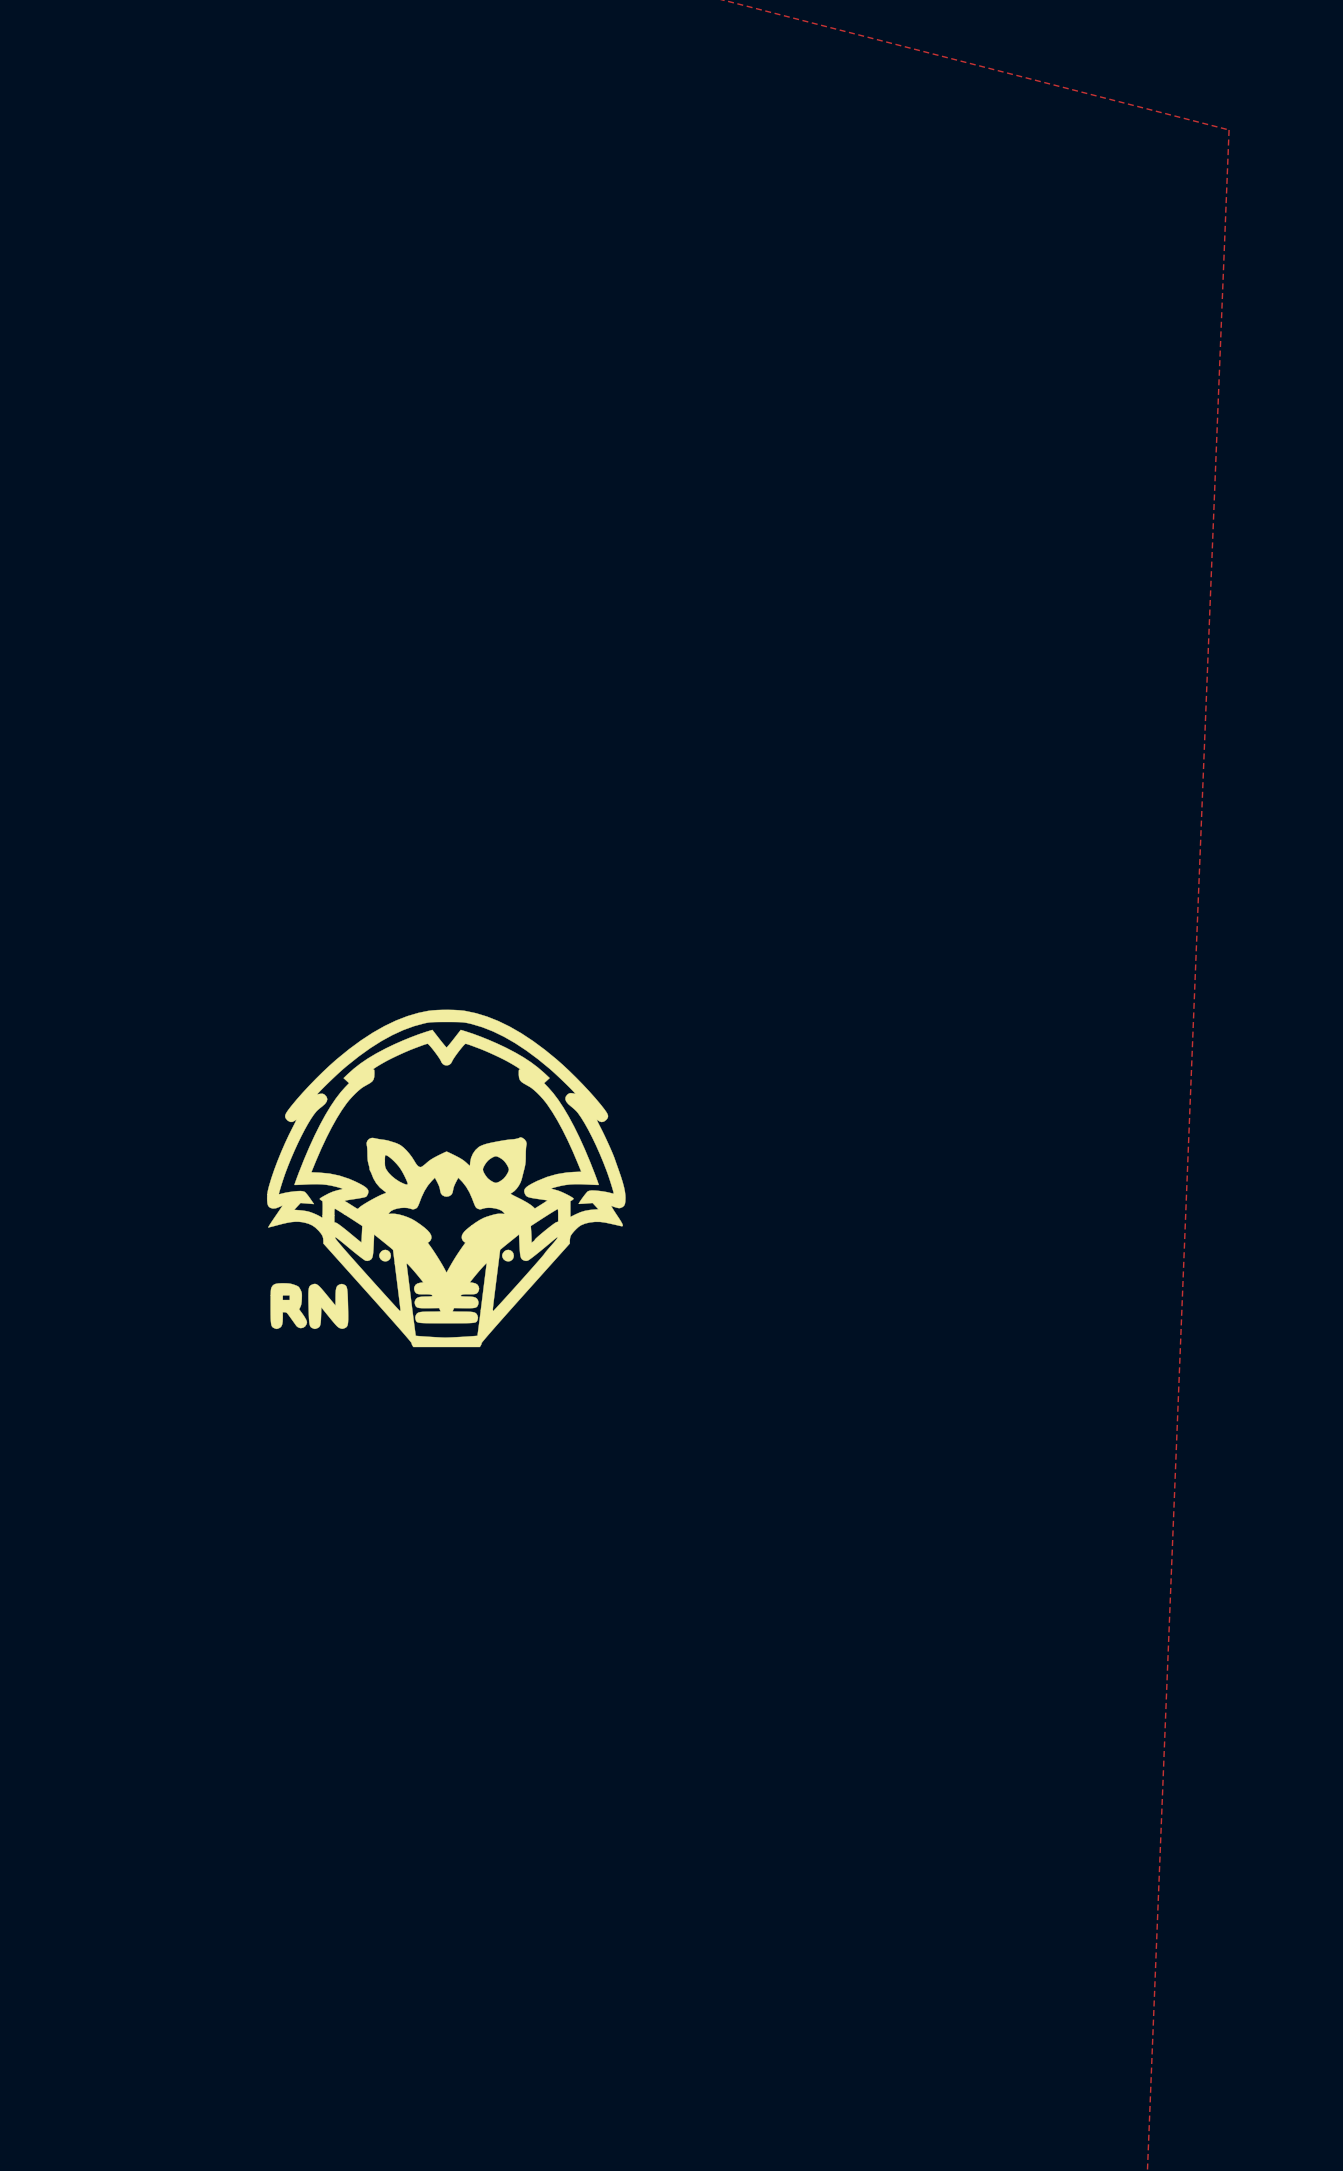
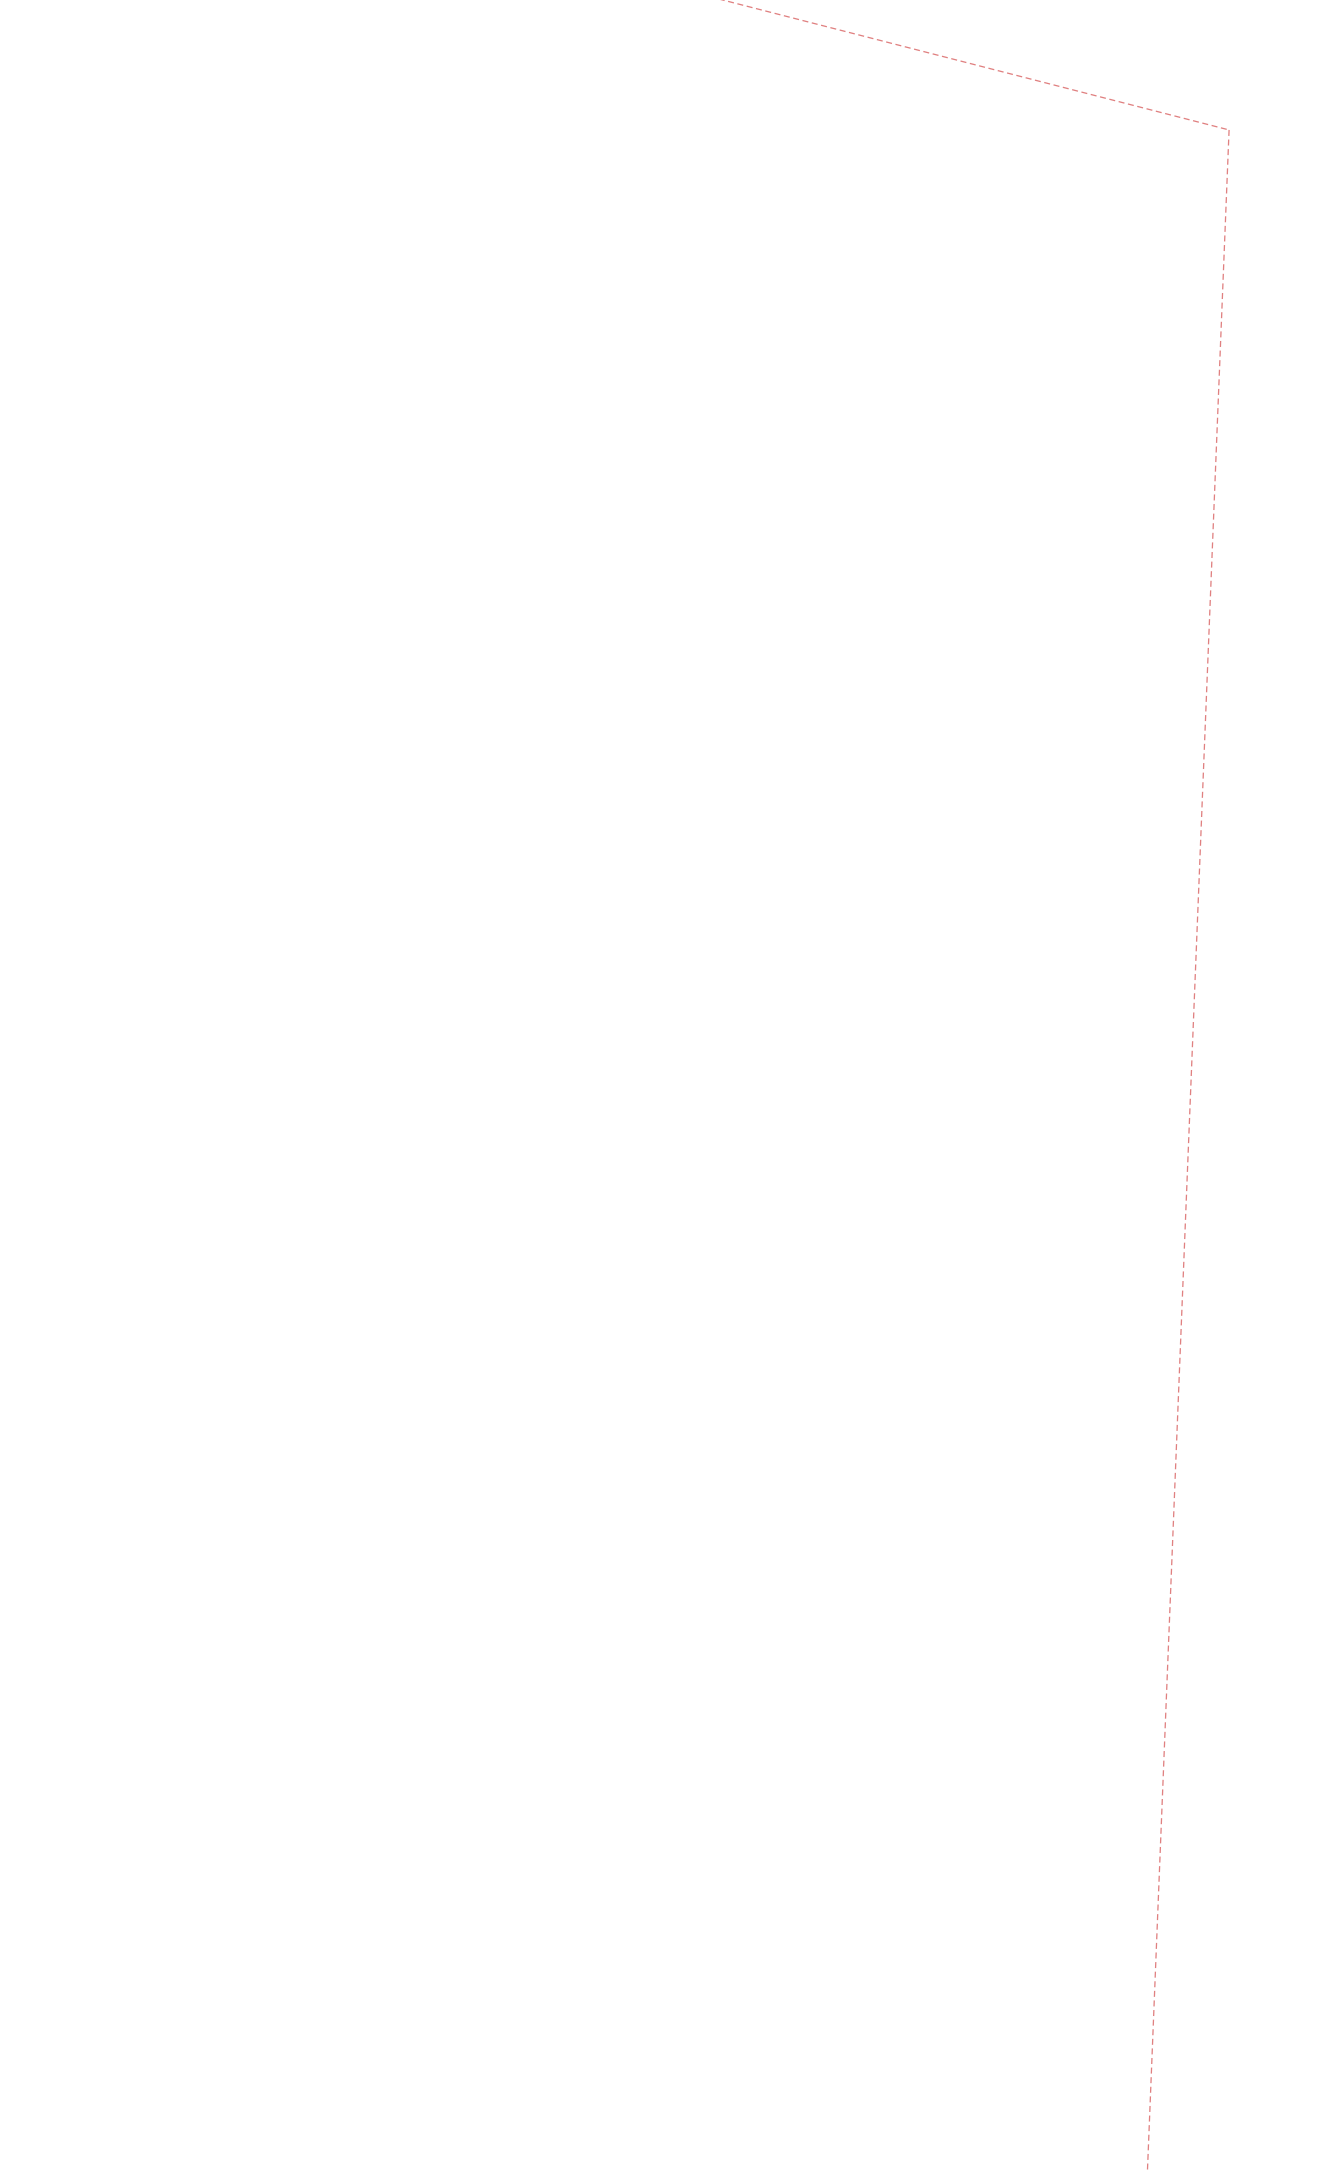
drawing: [266, 1009, 626, 1348] -> none

